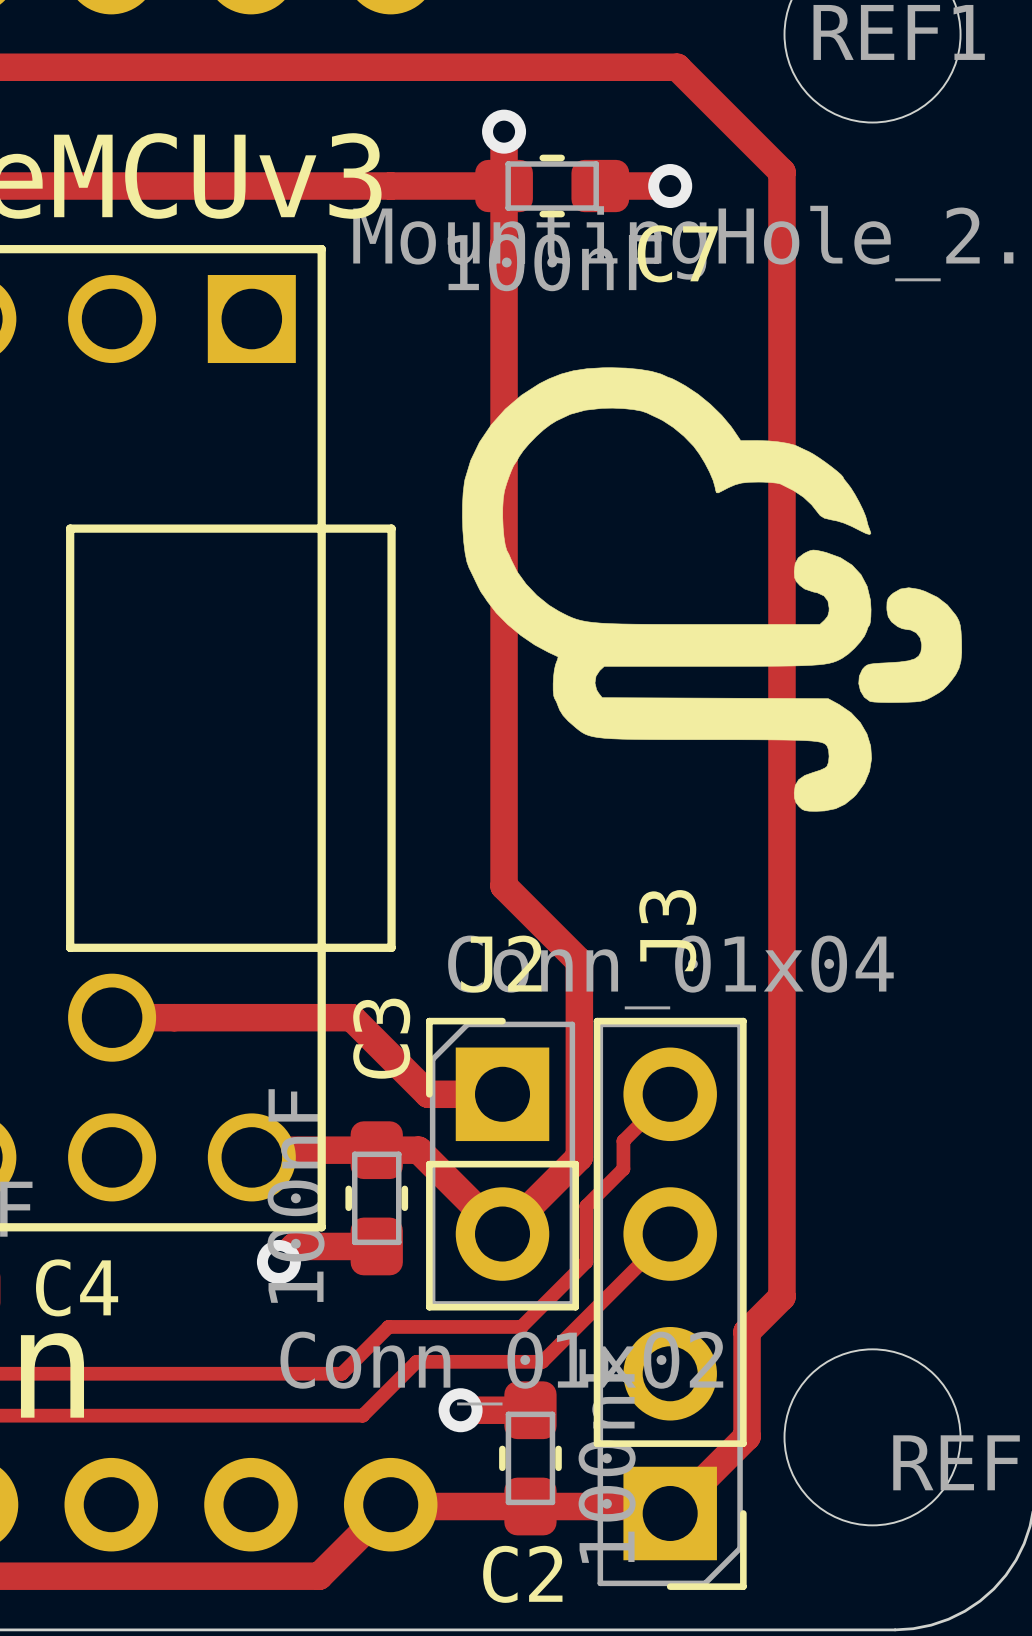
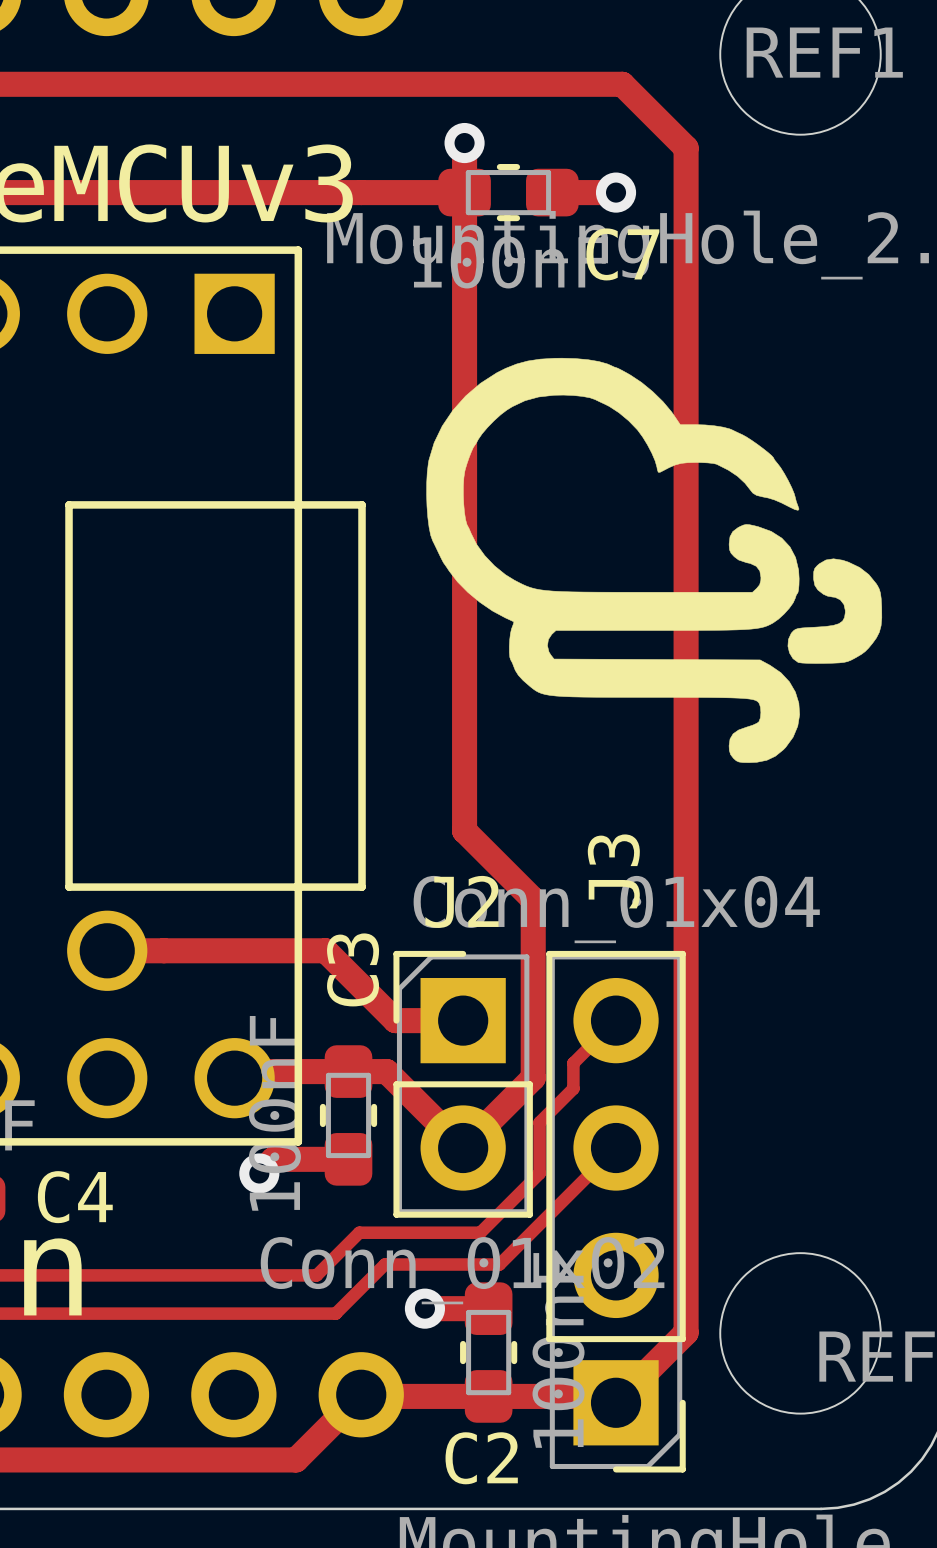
track: (747, 137) (781, 172) (781, 1296) (747, 1331) -> (686, 148) (686, 1237)

